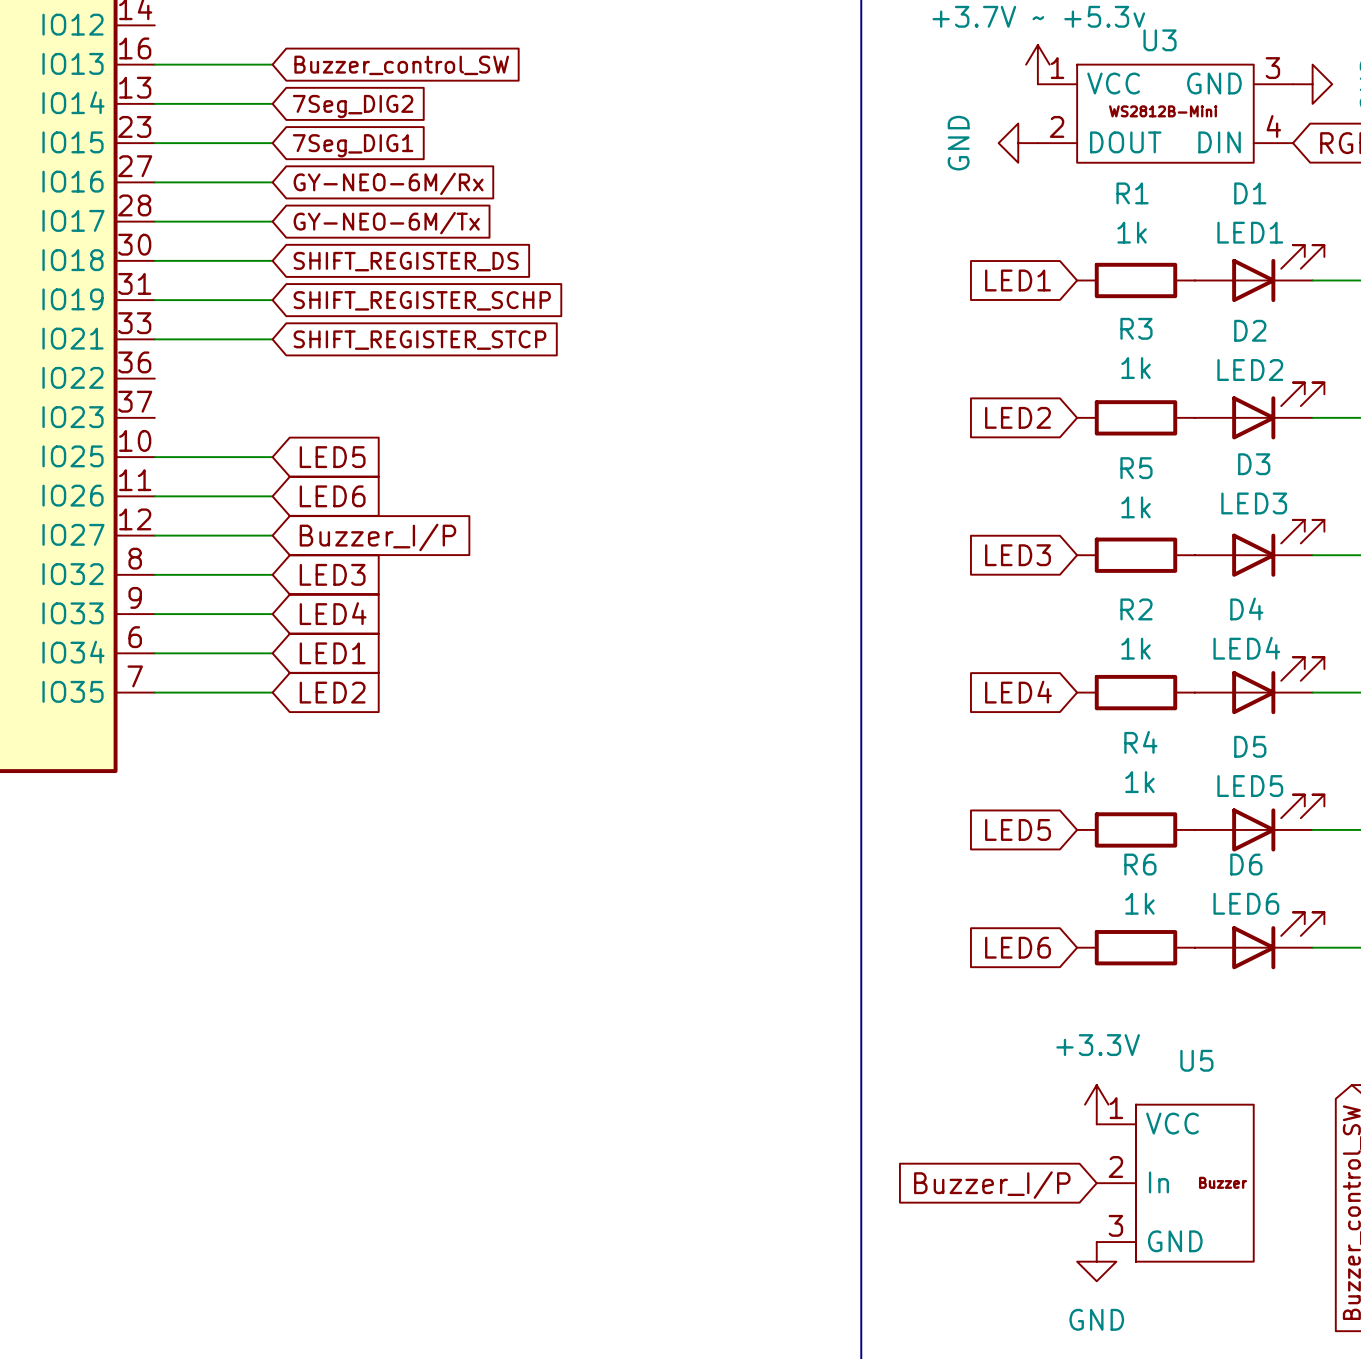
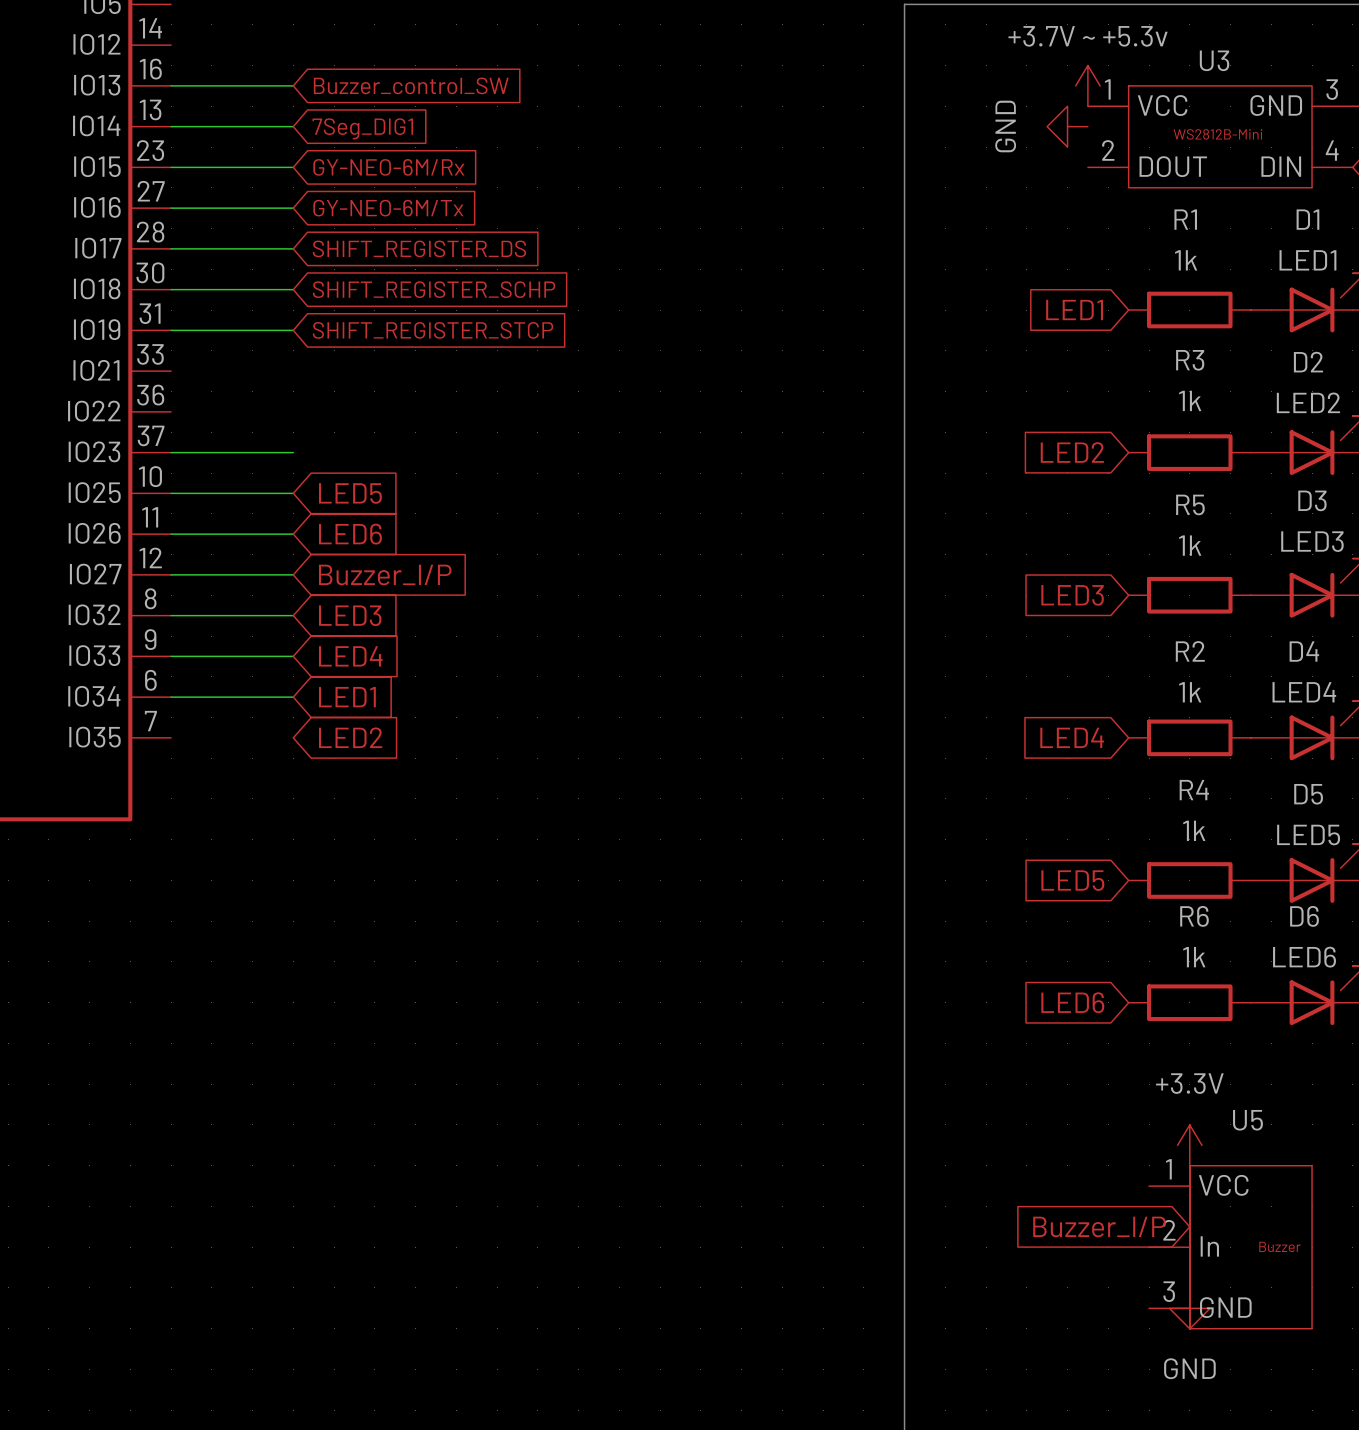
global label: 7Seg_DIG2 (353, 106) -> 7Seg_DIG1 (362, 128)
power symbol position: GND (1018, 143) -> GND (1067, 126)
global label: 7Seg_DIG1 (353, 145) -> GY-NEO-6M/Rx (388, 167)
global label: GY-NEO-6M/Rx (388, 183) -> GY-NEO-6M/Tx (388, 208)
global label: GY-NEO-6M/Tx (386, 223) -> SHIFT_REGISTER_DS (419, 248)
global label: SHIFT_REGISTER_DS (406, 261) -> SHIFT_REGISTER_SCHP (434, 289)
global label: SHIFT_REGISTER_SCHP (422, 300) -> SHIFT_REGISTER_STCP (433, 330)
wire: (154, 339) (272, 339) -> (171, 452) (293, 452)
global label: SHIFT_REGISTER_STCP (419, 340) -> none
wire: (154, 692) (272, 692) -> none
power symbol position: +3.3V (1096, 1104) -> +3.3V (1189, 1145)
global label position: Buzzer_I/P (992, 1185) -> Buzzer_I/P (1099, 1226)
power symbol position: GND (1096, 1261) -> GND (1189, 1308)

